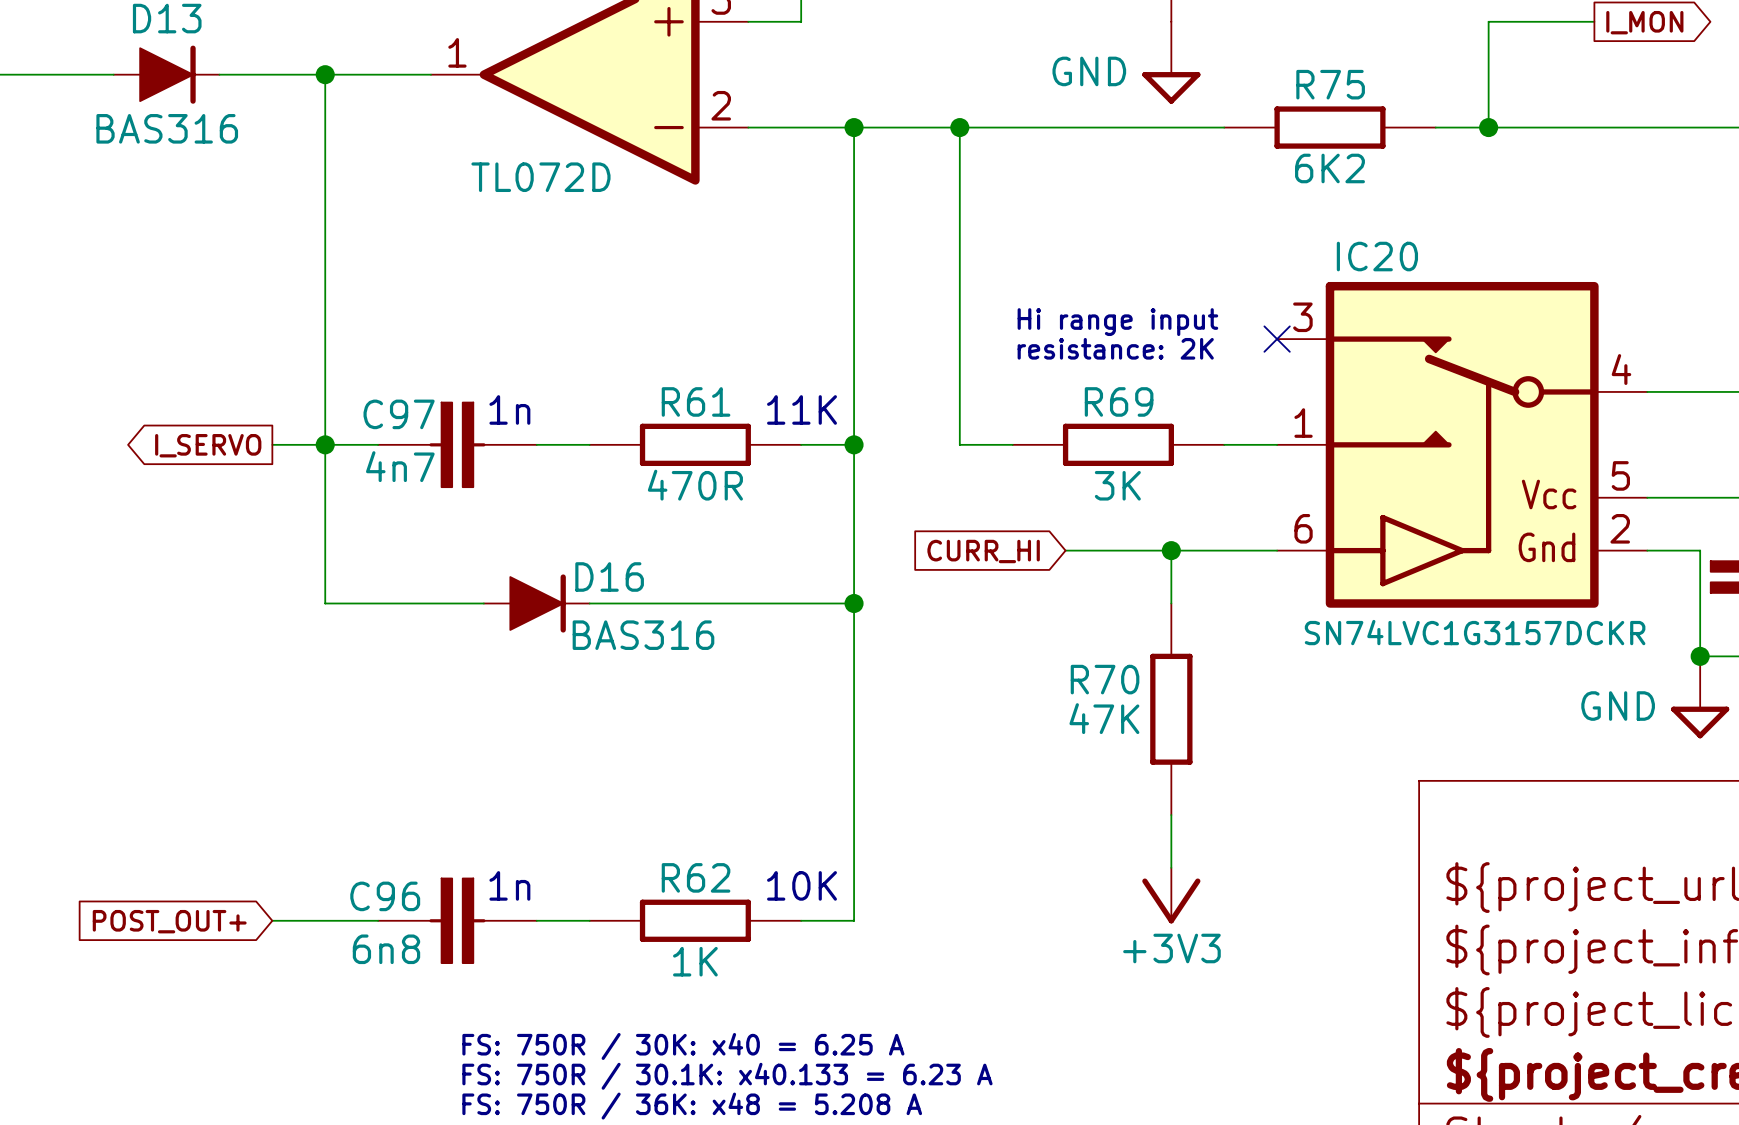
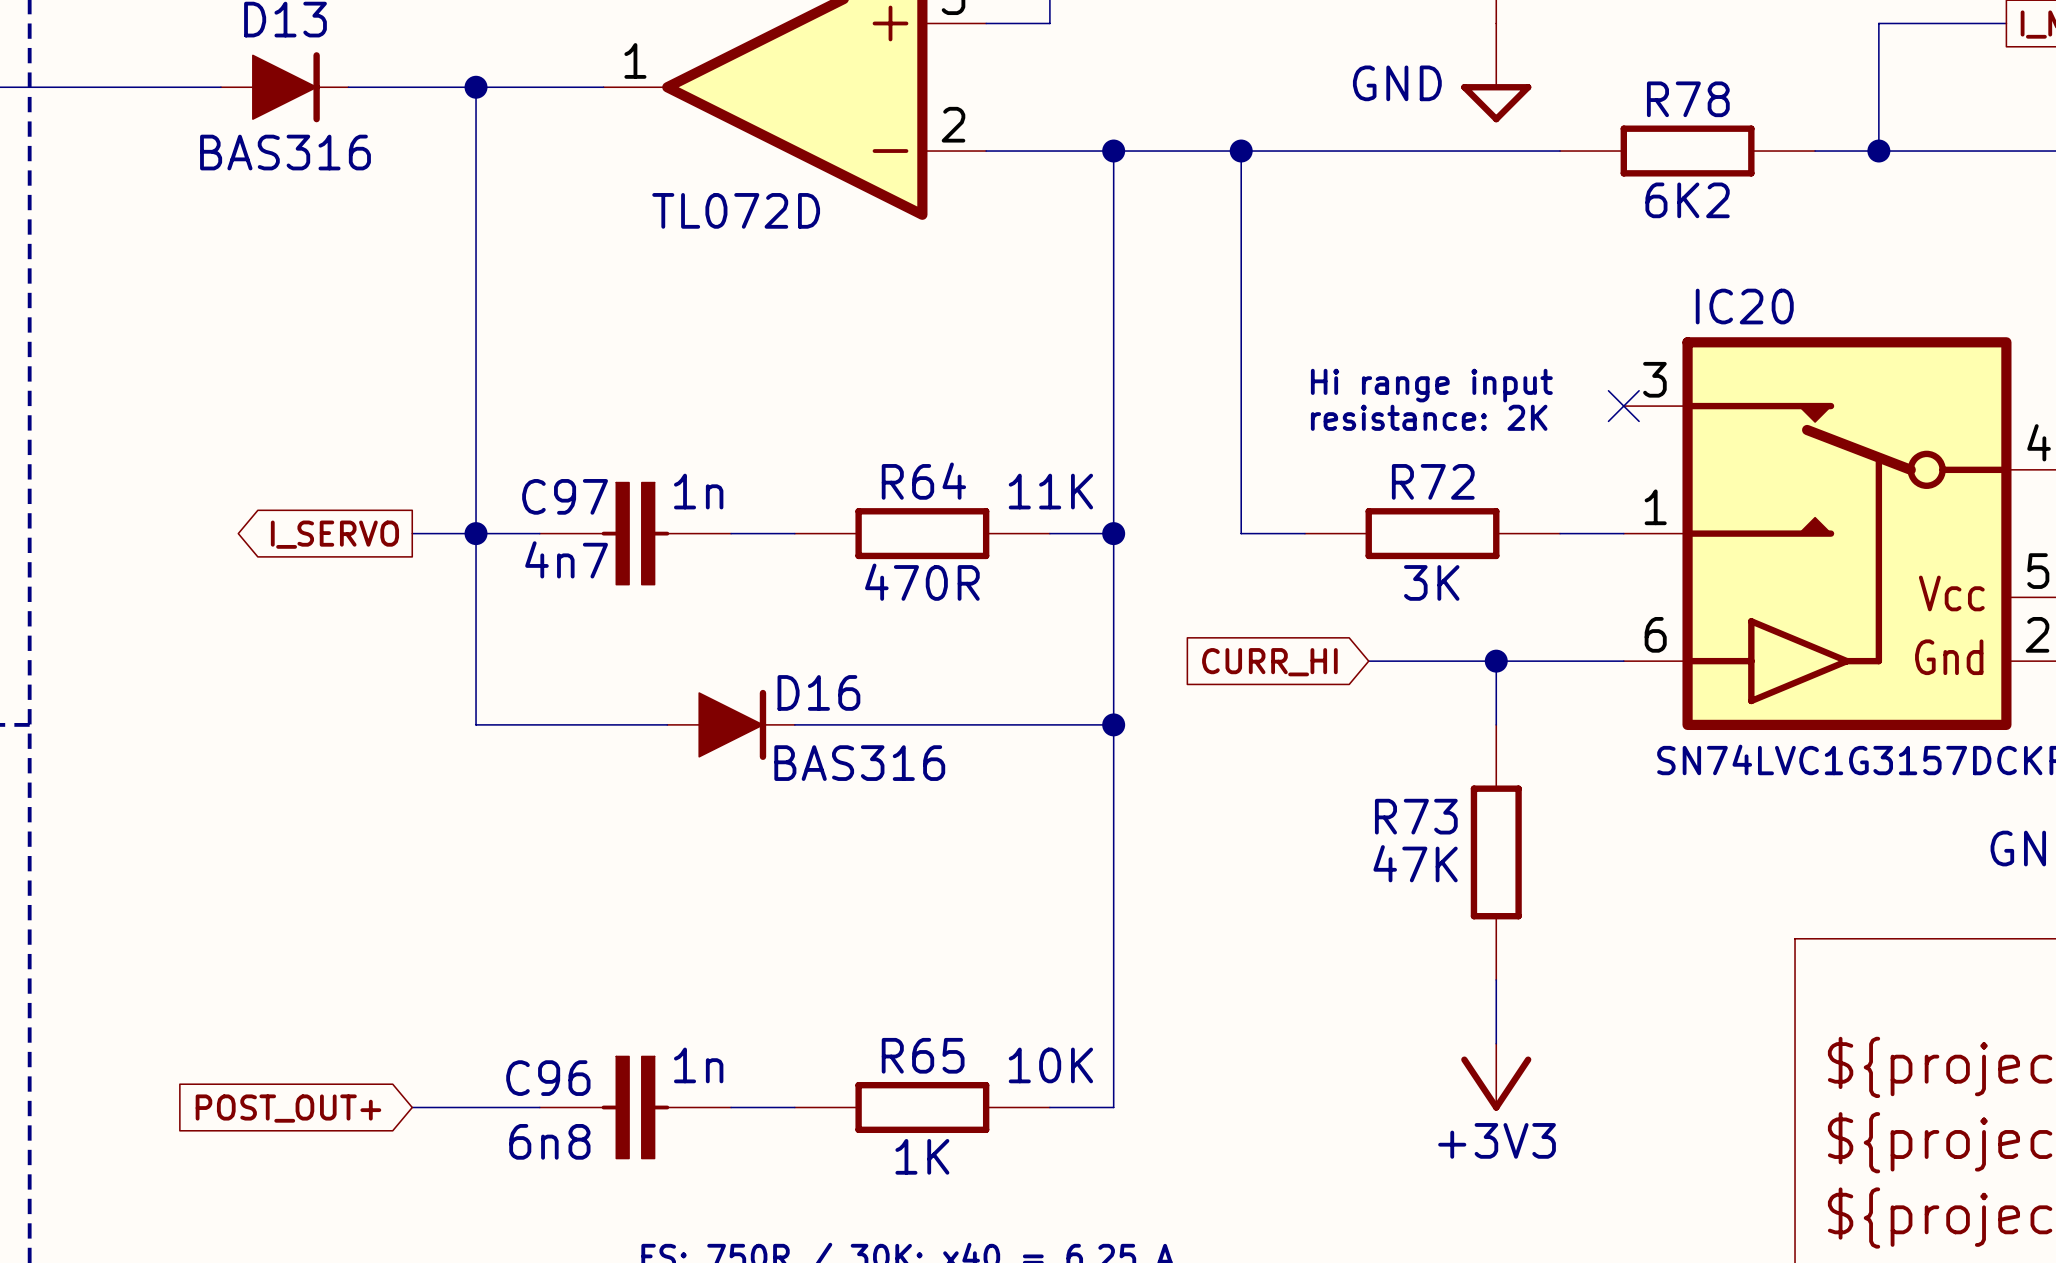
R75 name: R75 (1330, 84) -> R78 (1688, 99)
R61 name: R61 (696, 401) -> R64 (923, 481)
R69 name: R69 (1119, 401) -> R72 (1433, 481)
R70 name: R70 (1105, 679) -> R73 (1416, 816)
R62 name: R62 (696, 877) -> R65 (923, 1055)

